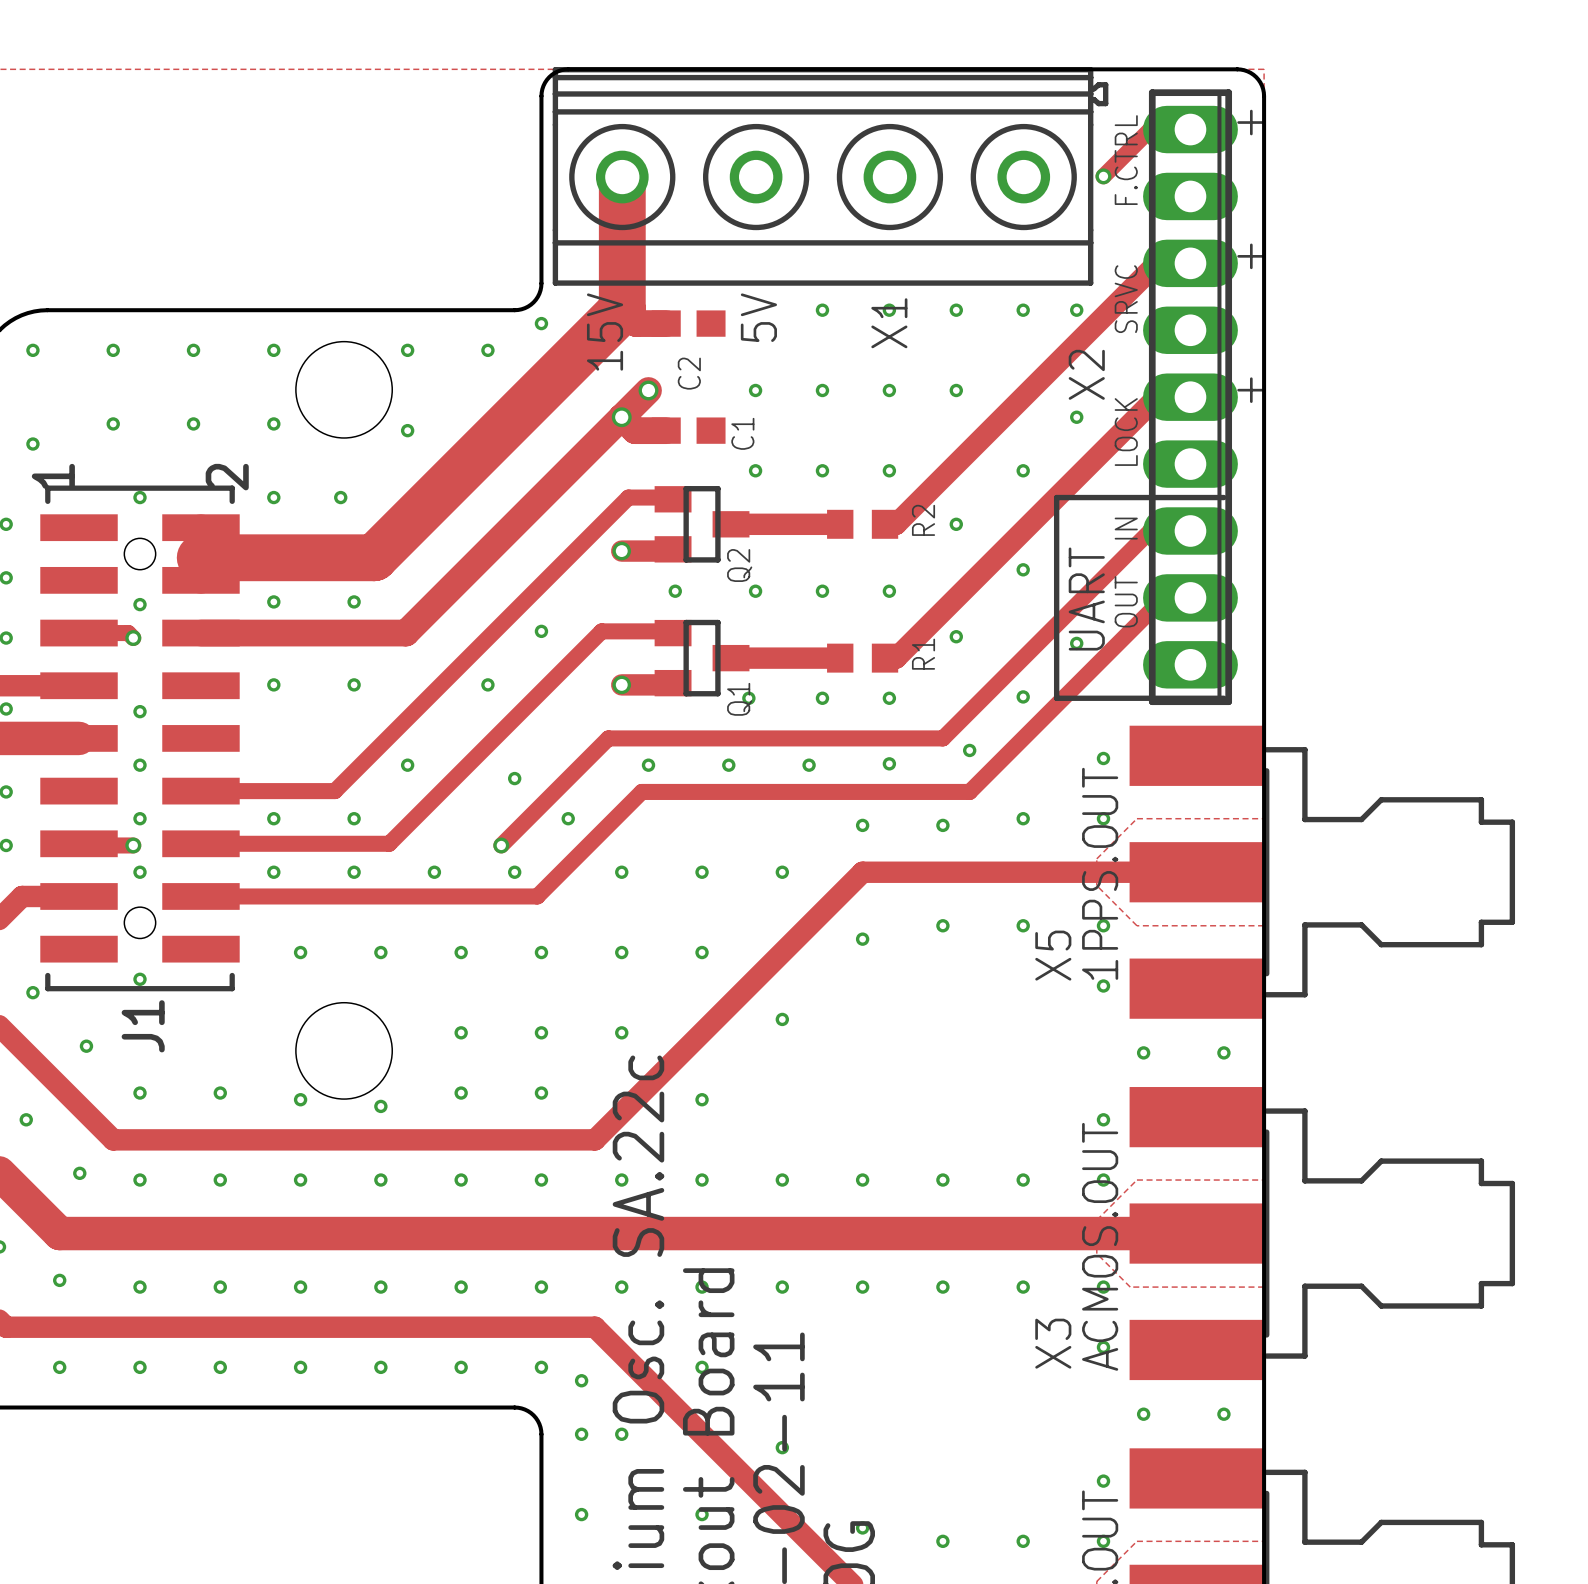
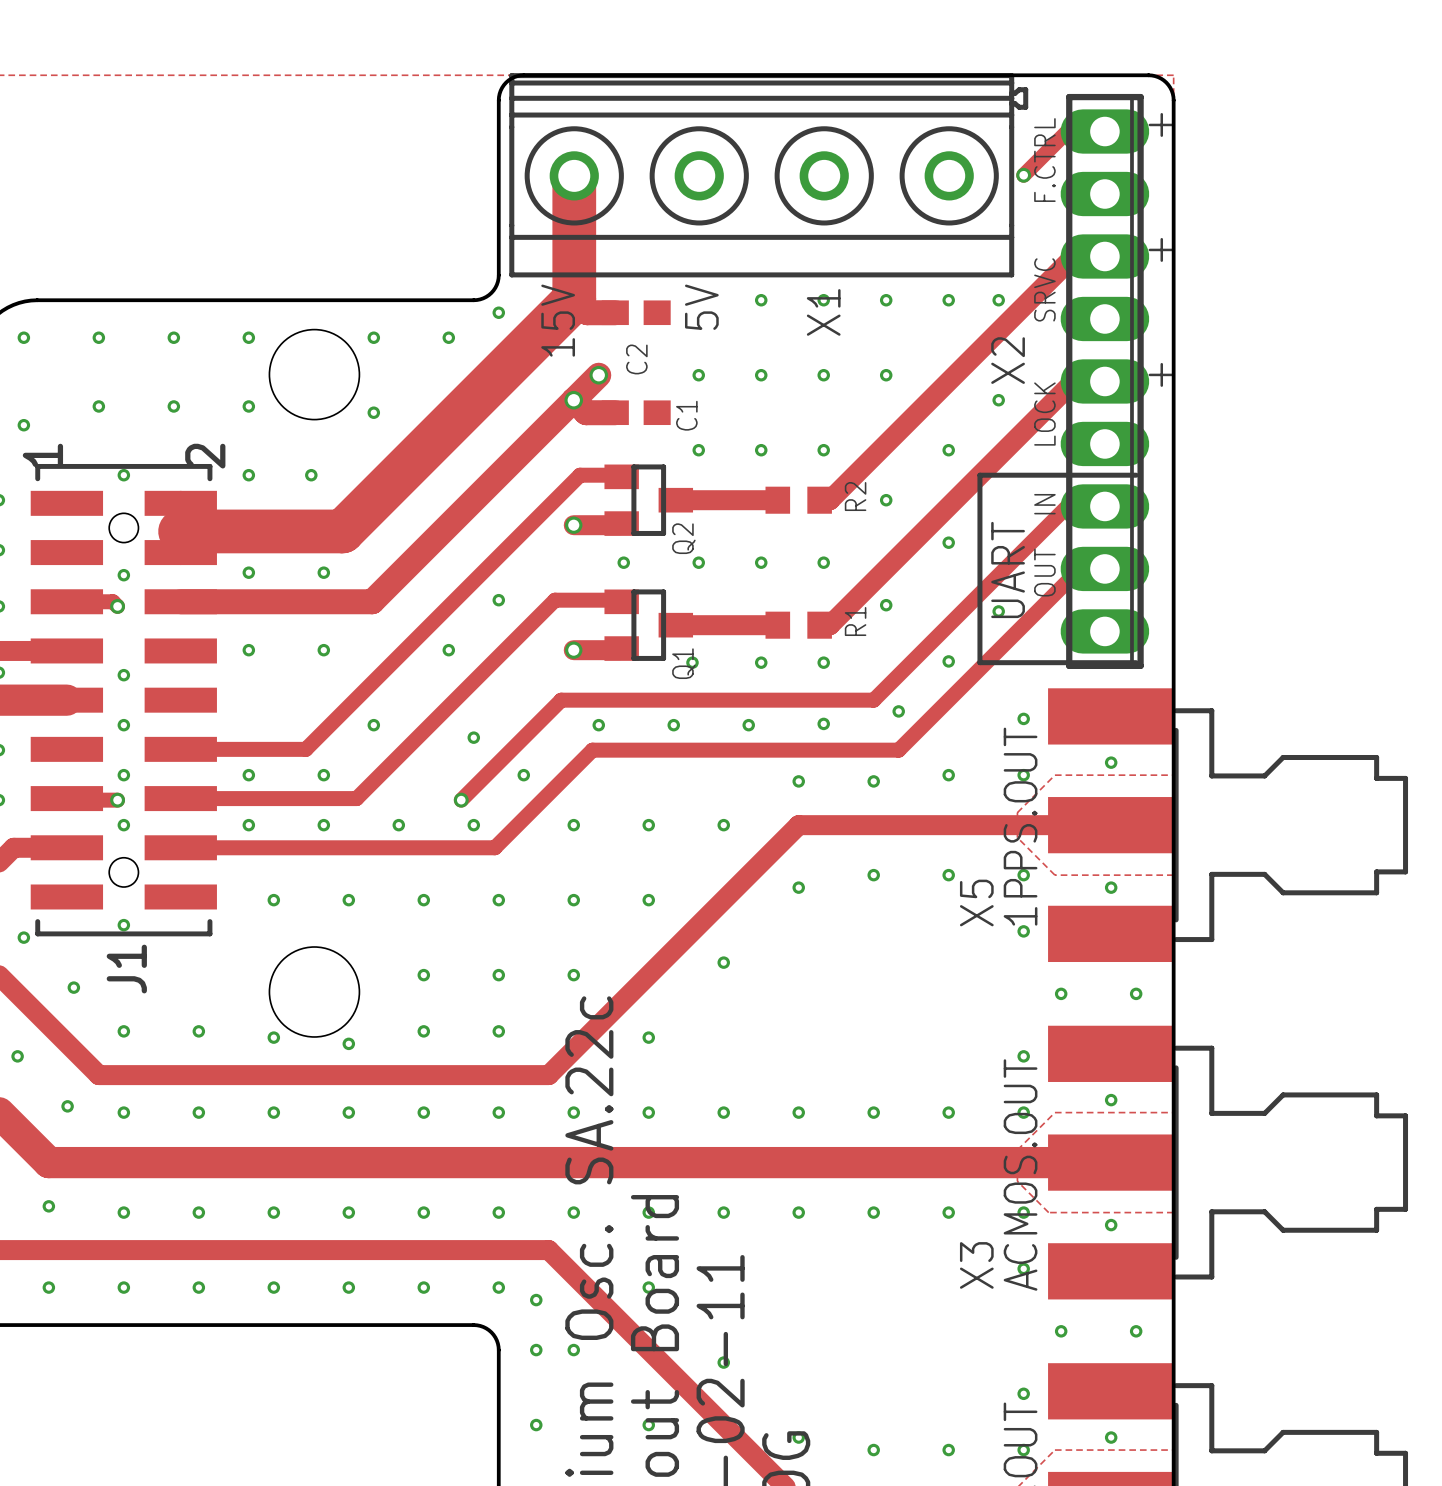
via: none -> (1111, 762)
via: none -> (1111, 887)
via: none -> (1111, 1100)
via: none -> (1111, 1225)
via: none -> (1111, 1437)

